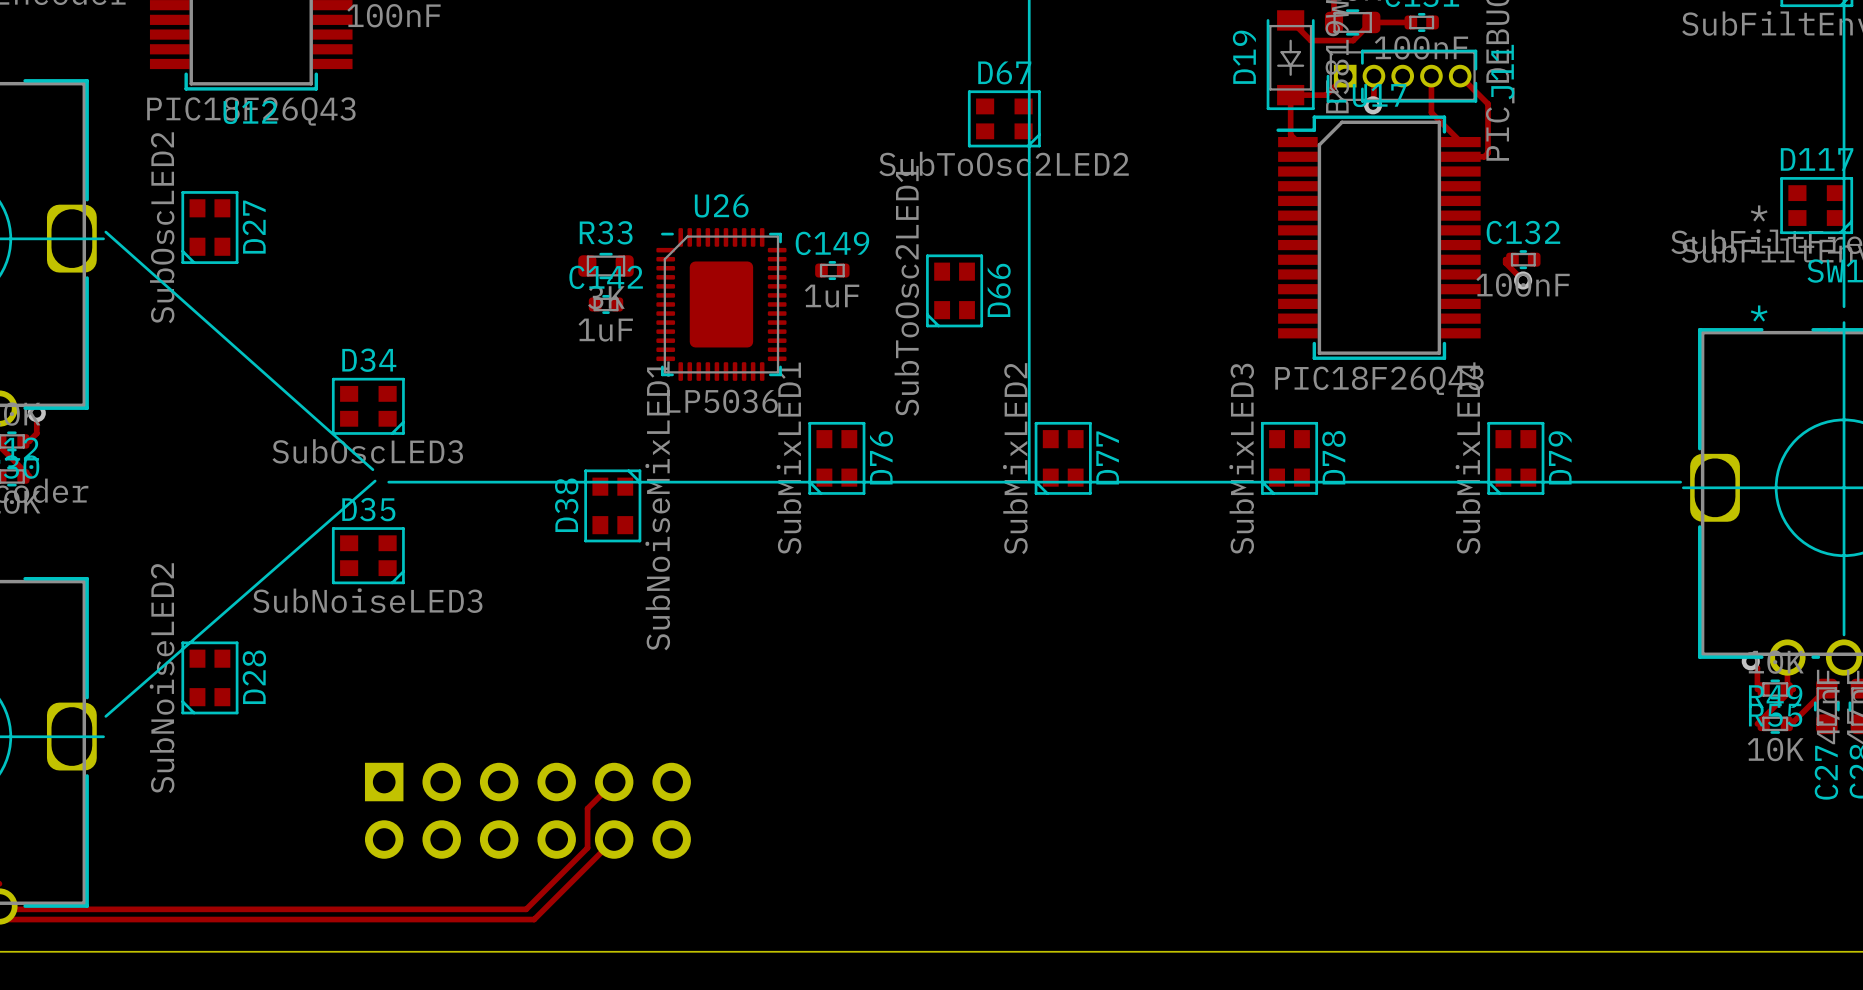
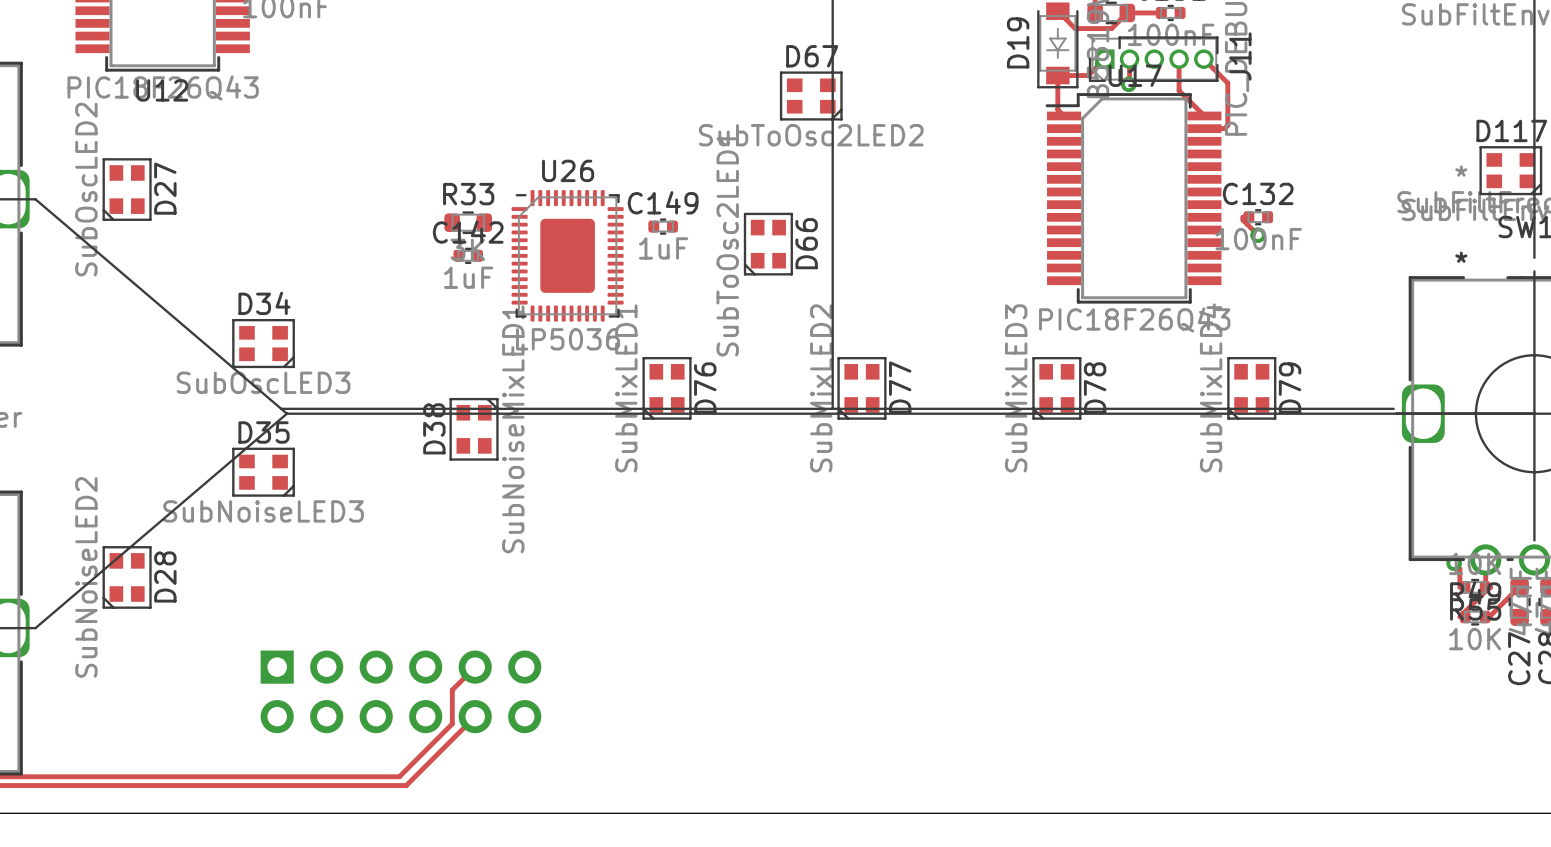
line: (105, 232) (372, 469) -> none
line: none -> (35, 199) (286, 413)
line: (375, 481) (105, 716) -> none
line: none -> (286, 413) (35, 628)
line: none -> (286, 413) (1534, 413)

